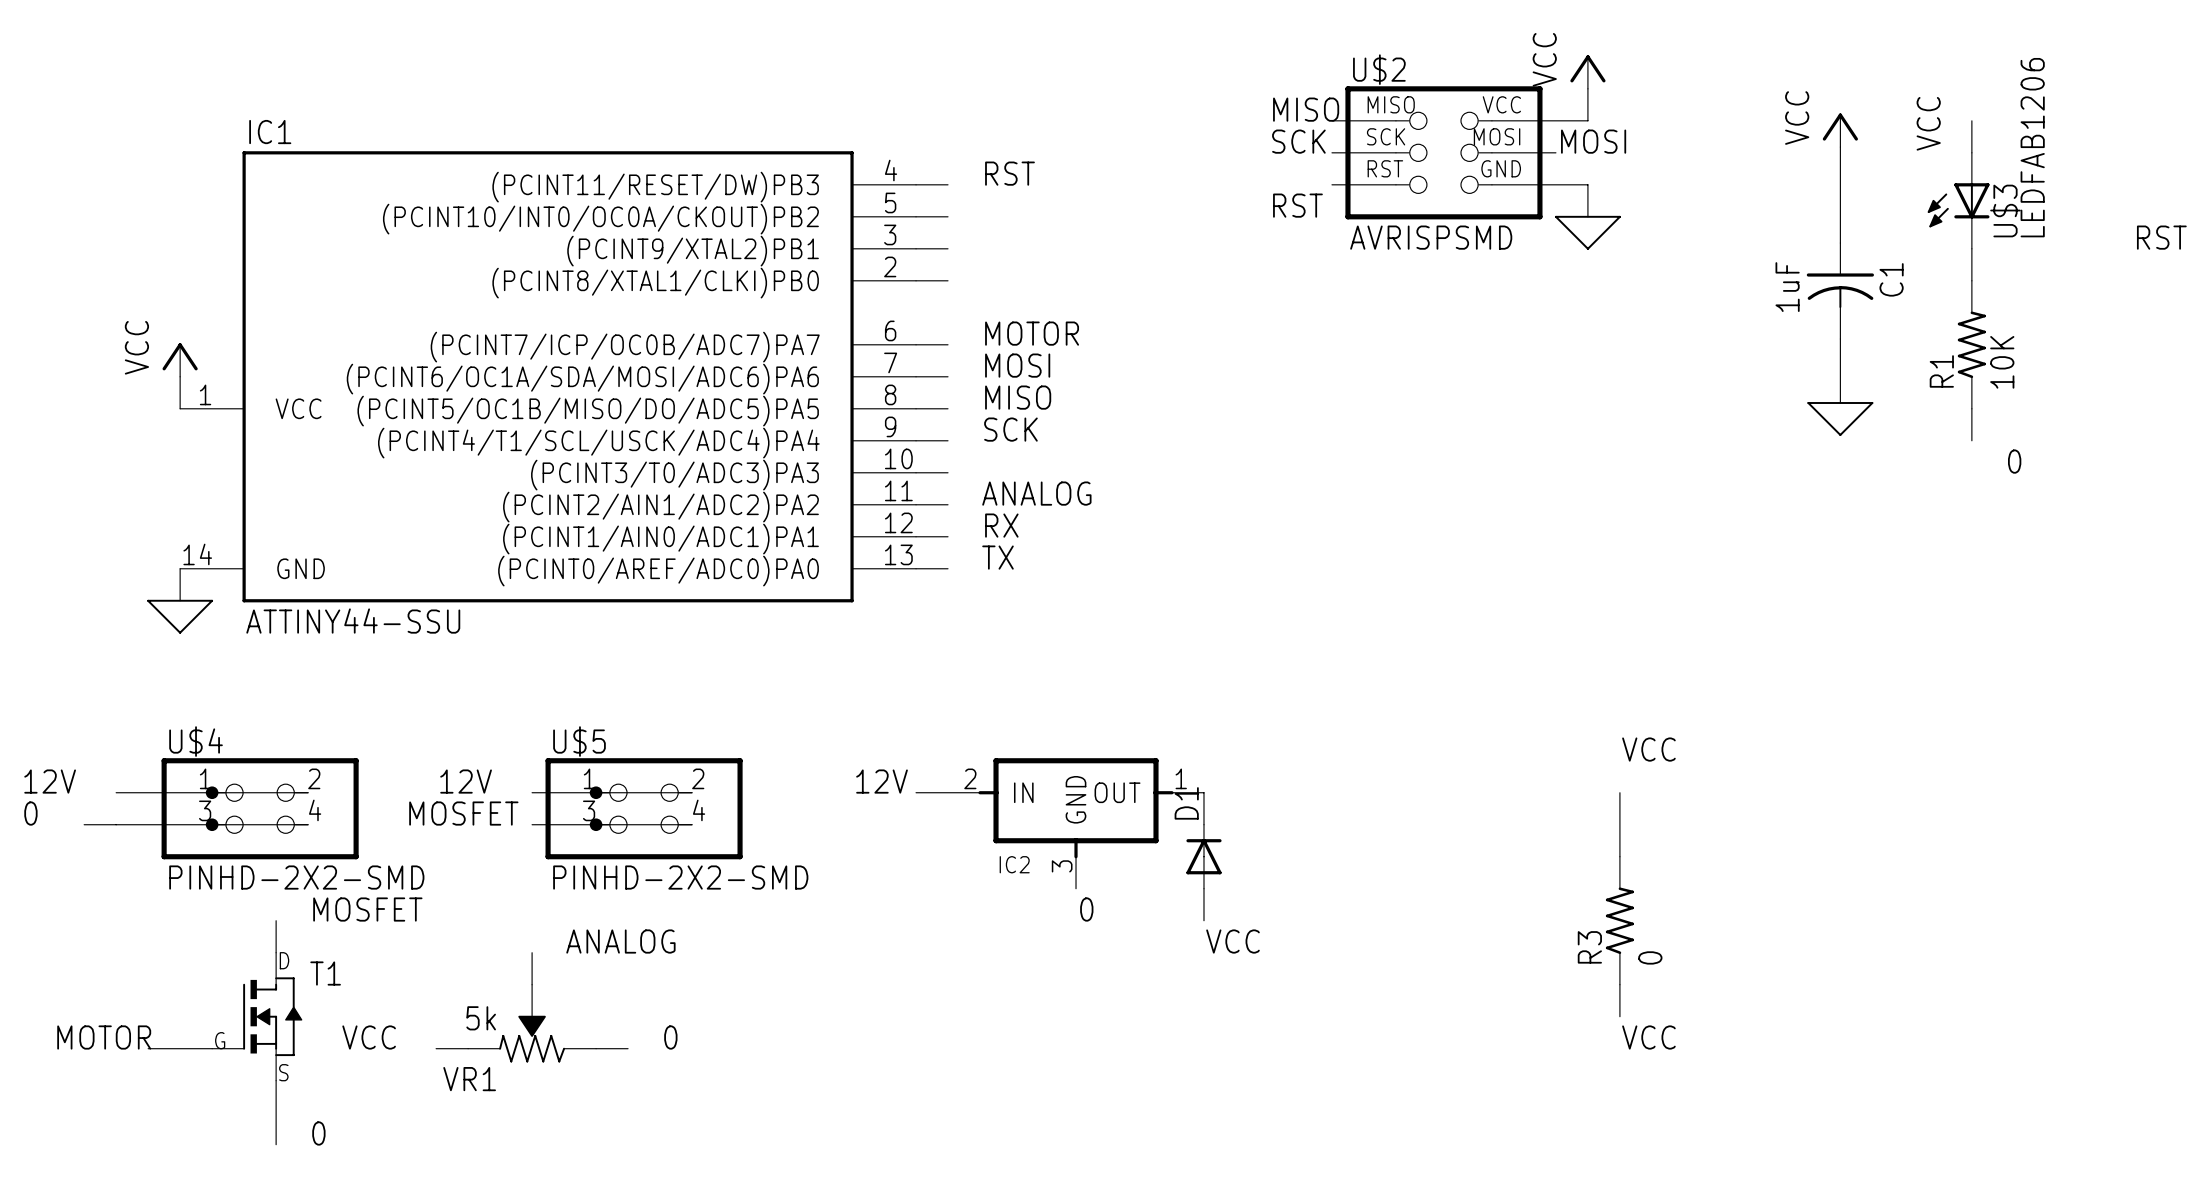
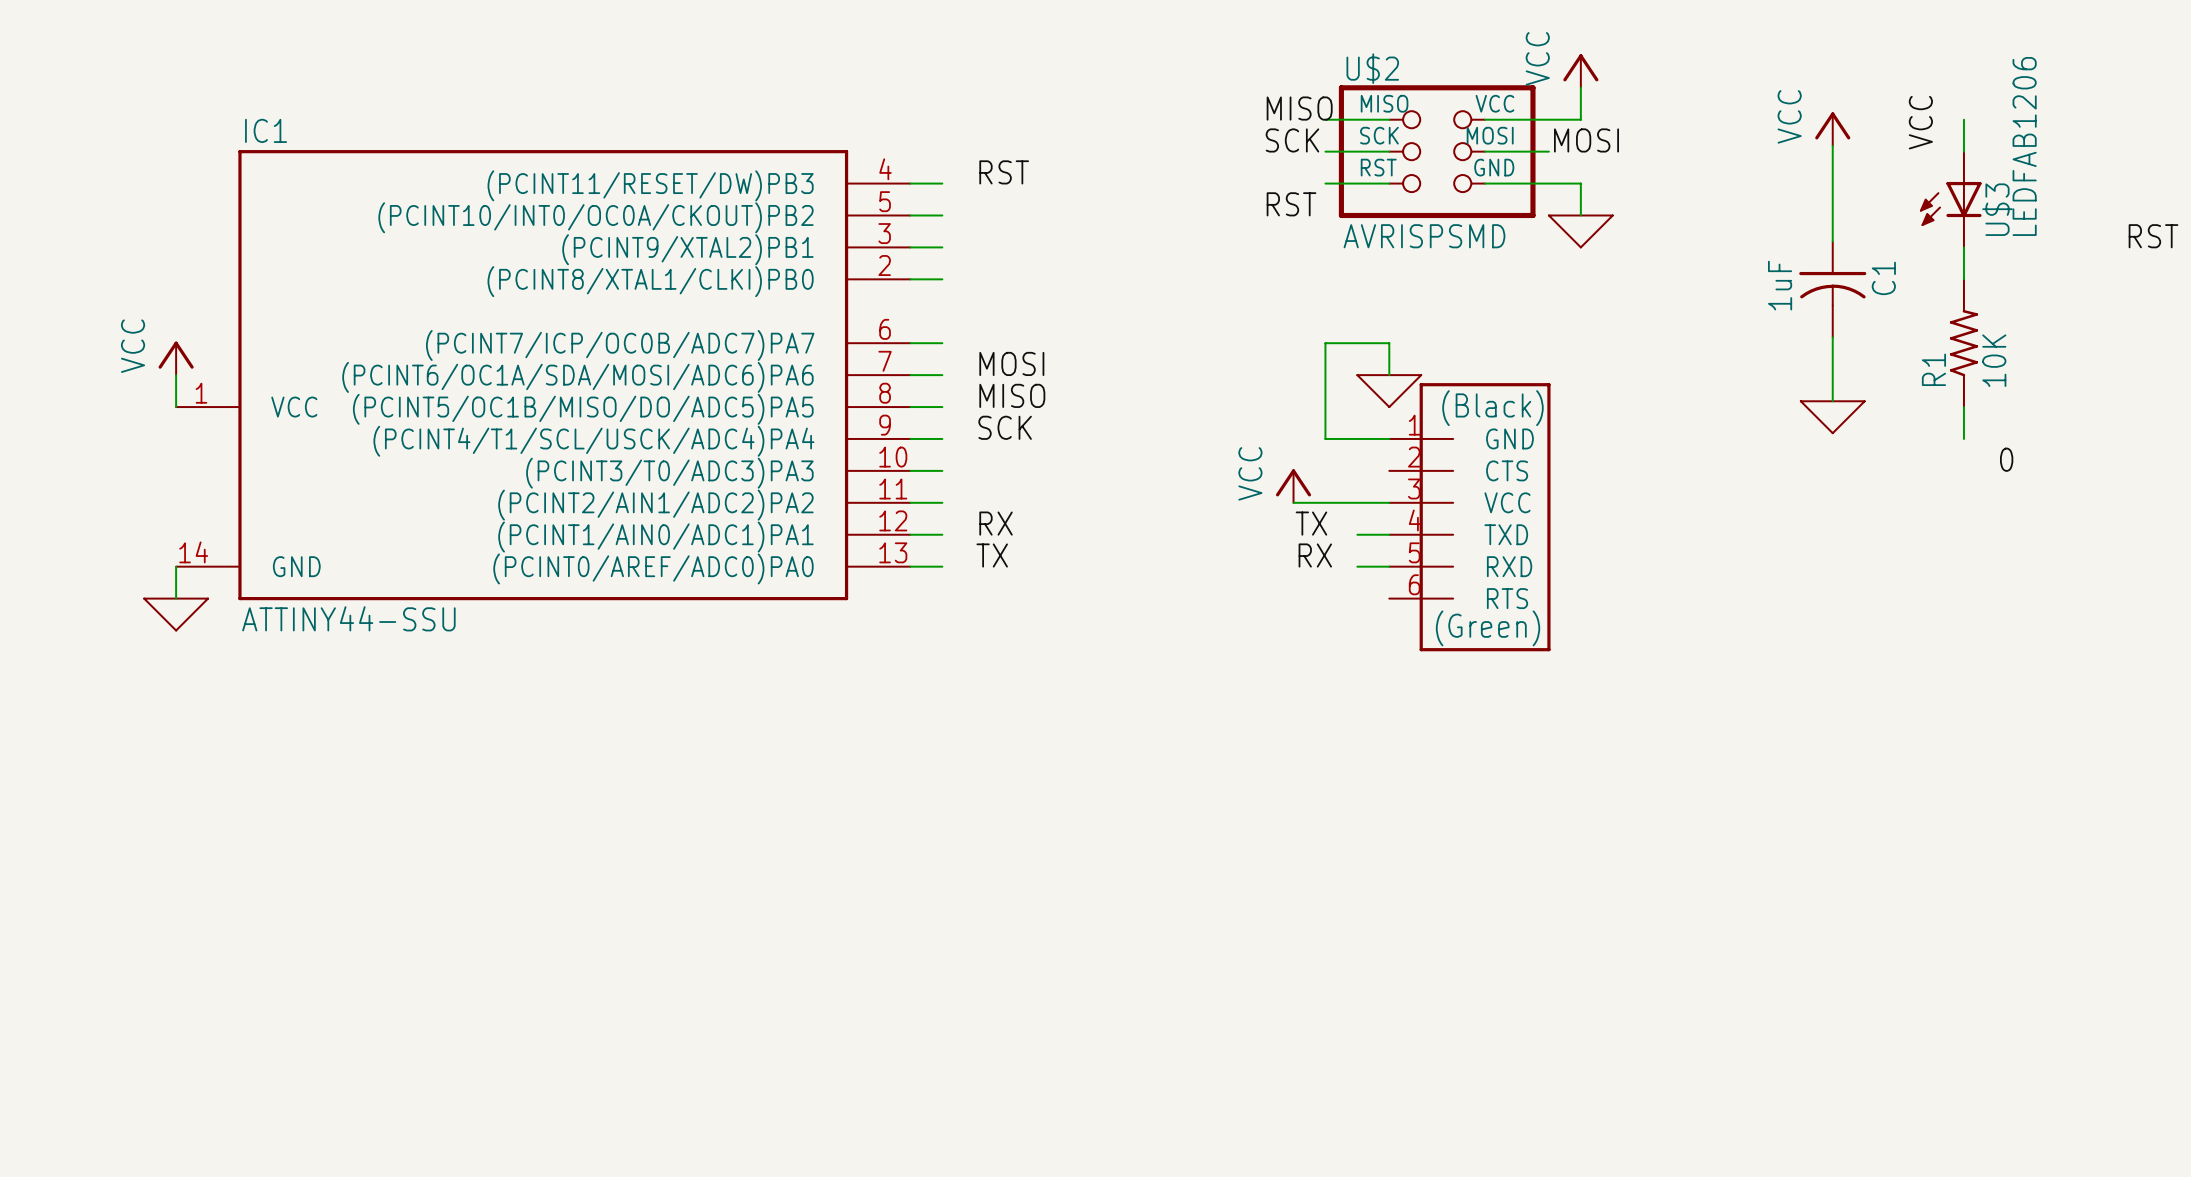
label: MOTOR (1032, 333) -> none
wire: none -> (1389, 375) (1389, 343) (1325, 343) (1325, 438) (1389, 438)
power symbol: none -> (1389, 391)
power symbol: none -> VCC (1293, 486)
label: ANALOG (1036, 493) -> none
wire: none -> (1293, 502) (1389, 502)
part: none -> (1469, 517)
label: none -> TX (1311, 523)
wire: none -> (1357, 534) (1389, 534)
label: none -> RX (1315, 555)
wire: none -> (1357, 566) (1389, 566)
label: VCC (1648, 749) -> none
label: 12V (50, 781) -> none
label: 12V (466, 781) -> none
label: 12V (882, 781) -> none
wire: (116, 792) (308, 792) -> none
junction: (212, 792) -> none
wire: (532, 792) (692, 792) -> none
junction: (596, 792) -> none
wire: (916, 792) (980, 792) -> none
wire: (1171, 792) (1203, 792) (1203, 824) -> none
wire: (1619, 792) (1619, 856) -> none
U$4: PINHD-2X2-SMD (260, 808) -> none
U$5: PINHD-2X2-SMD (644, 808) -> none
IC2: (1076, 808) -> none
label: 0 (30, 813) -> none
label: MOSFET (463, 813) -> none
wire: (84, 824) (308, 824) -> none
junction: (212, 824) -> none
wire: (532, 824) (692, 824) -> none
junction: (596, 824) -> none
wire: (1076, 856) (1076, 888) -> none
D1: (1203, 856) -> none
wire: (1203, 888) (1203, 920) -> none
label: MOSFET (367, 909) -> none
label: 0 (1086, 909) -> none
wire: (276, 920) (276, 952) -> none
R3: 0 (1619, 920) -> none
label: ANALOG (620, 941) -> none
label: VCC (1233, 941) -> none
wire: (532, 952) (532, 984) -> none
wire: (1619, 984) (1619, 1016) -> none
T1: (257, 1016) -> none
VR1: 5k (532, 1023) -> none
label: MOTOR (104, 1037) -> none
label: VCC (369, 1037) -> none
label: 0 (670, 1037) -> none
label: VCC (1648, 1037) -> none
wire: (148, 1048) (212, 1048) -> none
wire: (436, 1048) (468, 1048) -> none
wire: (596, 1048) (628, 1048) -> none
wire: (276, 1080) (276, 1144) -> none
label: 0 (318, 1133) -> none

